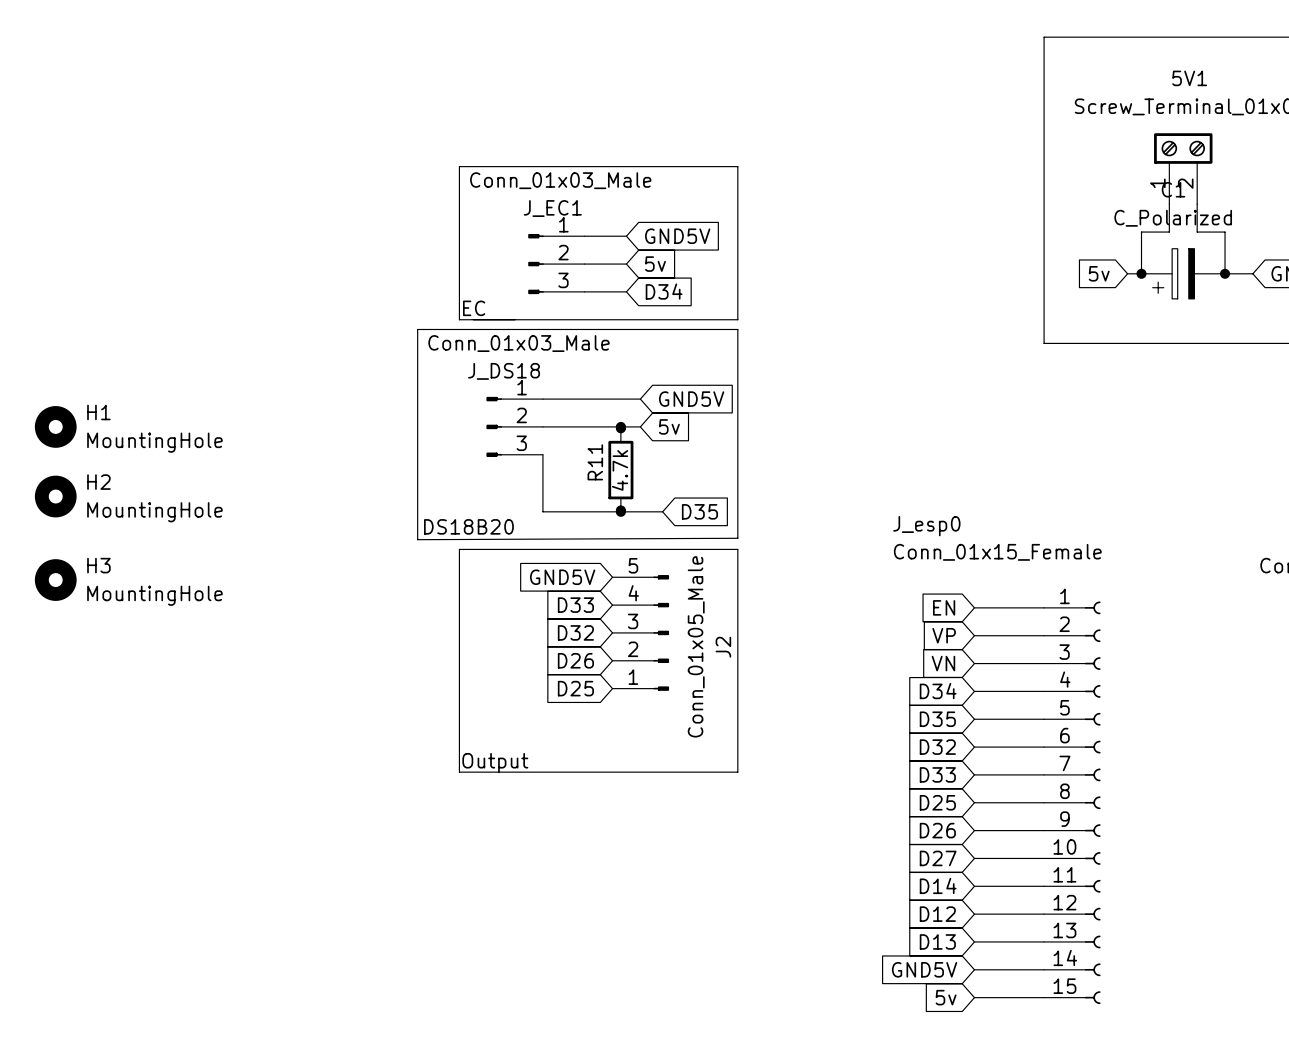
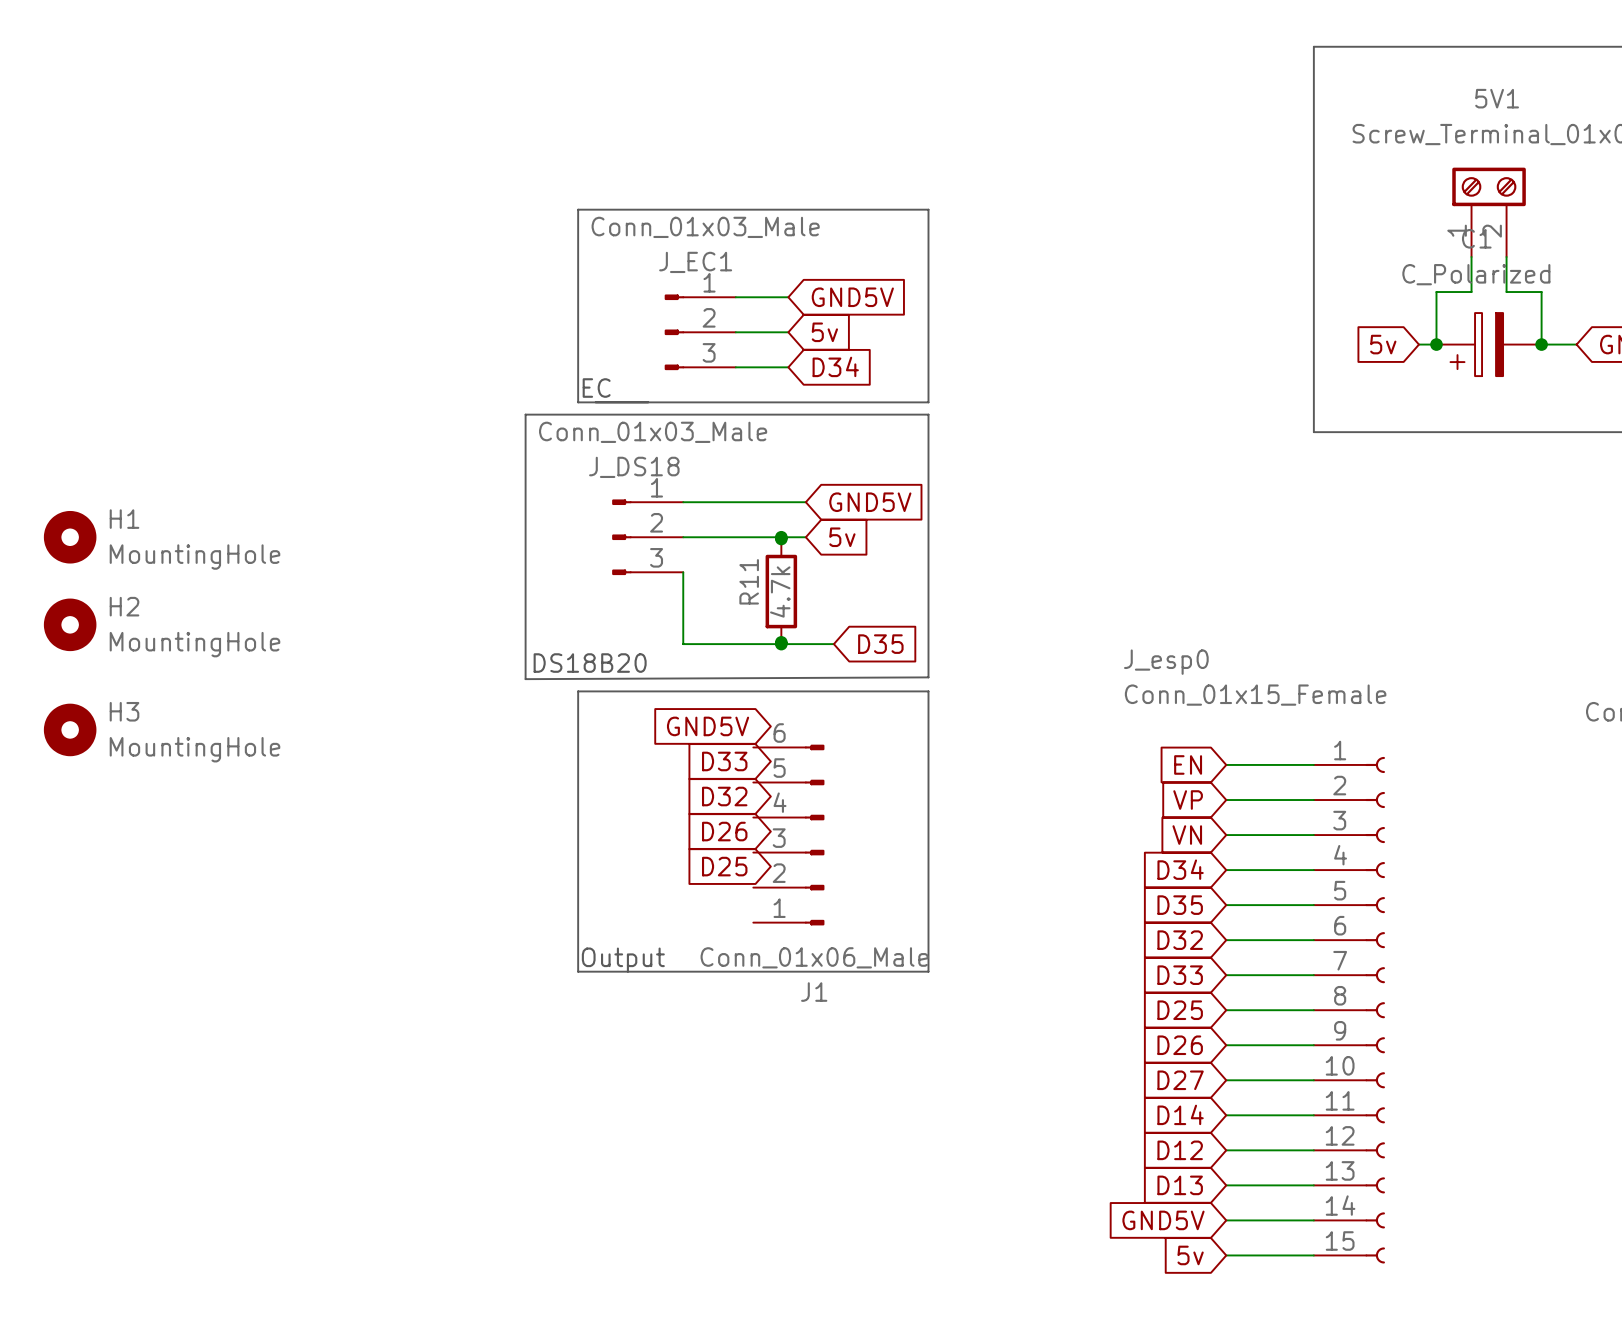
J2: Conn_01x05_Male (640, 632) -> none
J1: none -> Conn_01x06_Male (788, 835)

